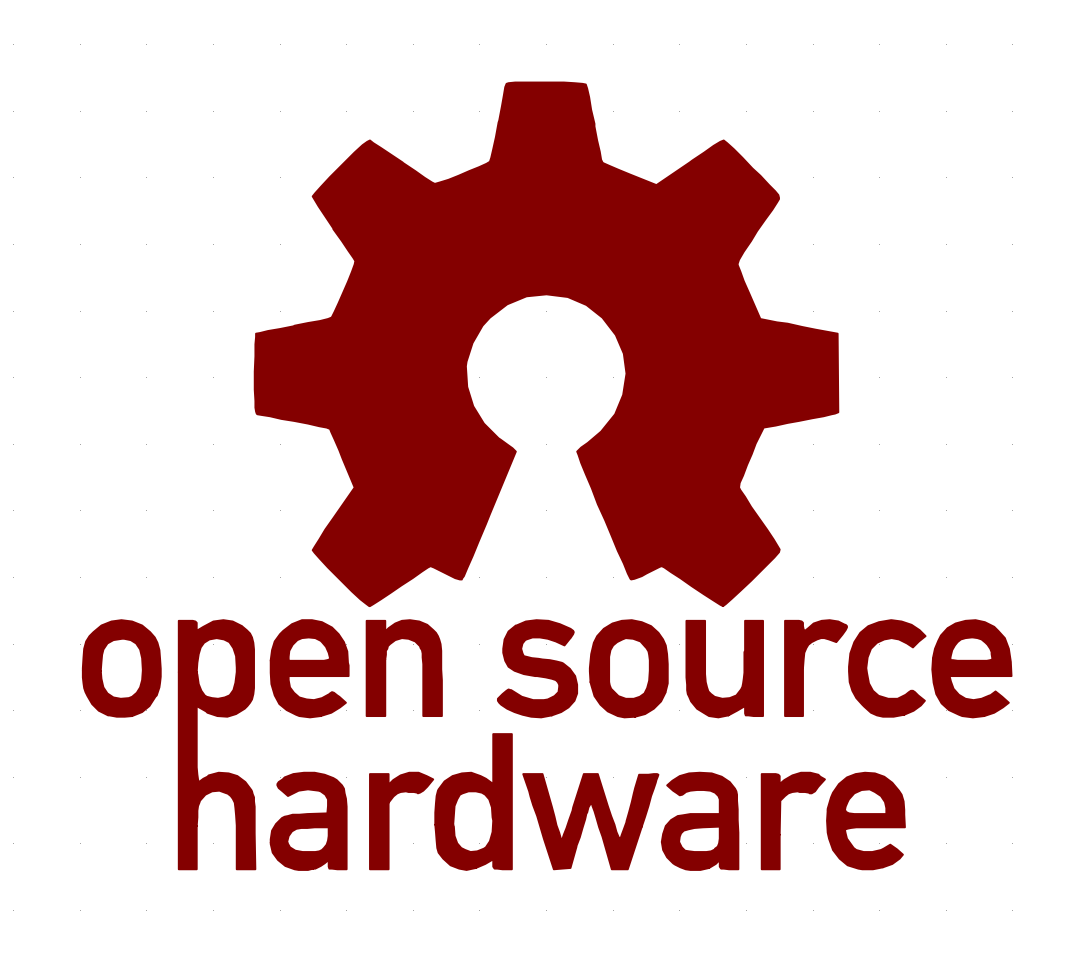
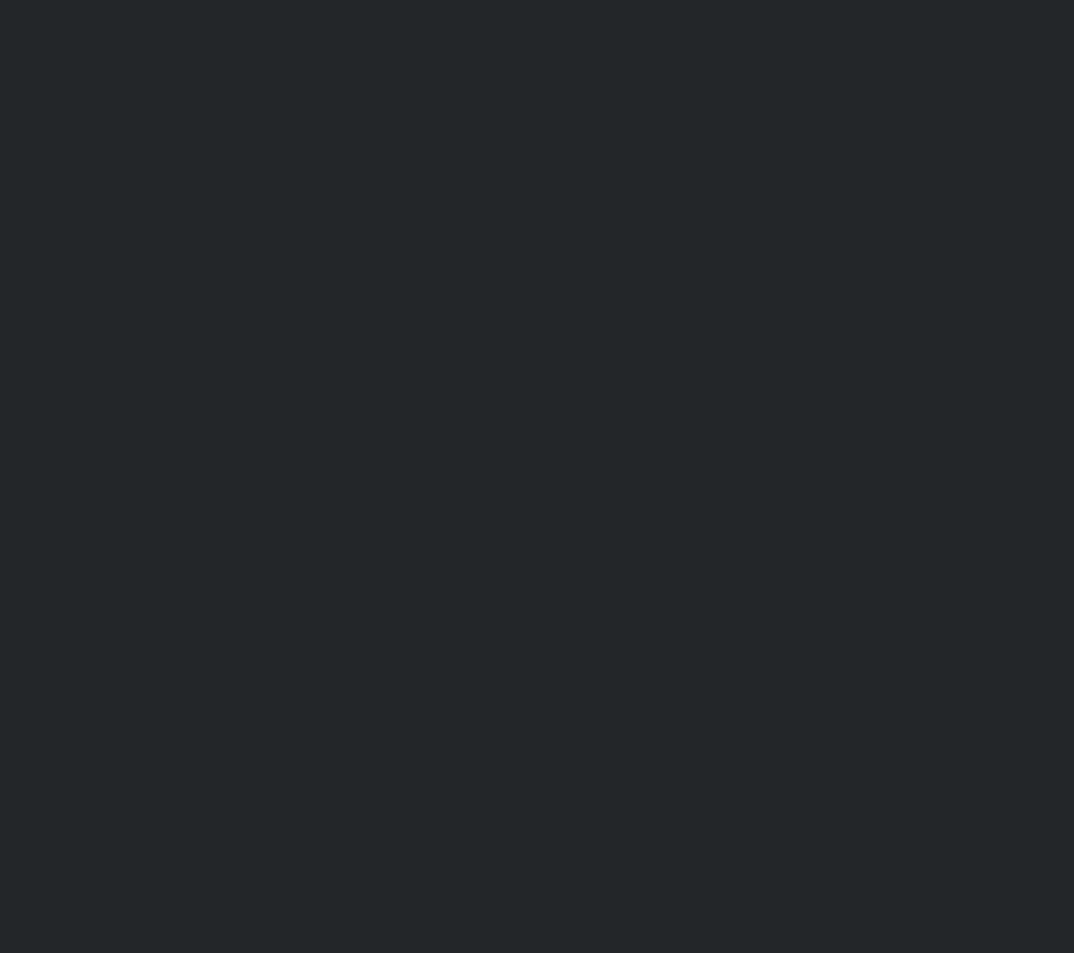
power symbol: (546, 344) -> none
power symbol: (547, 745) -> none

